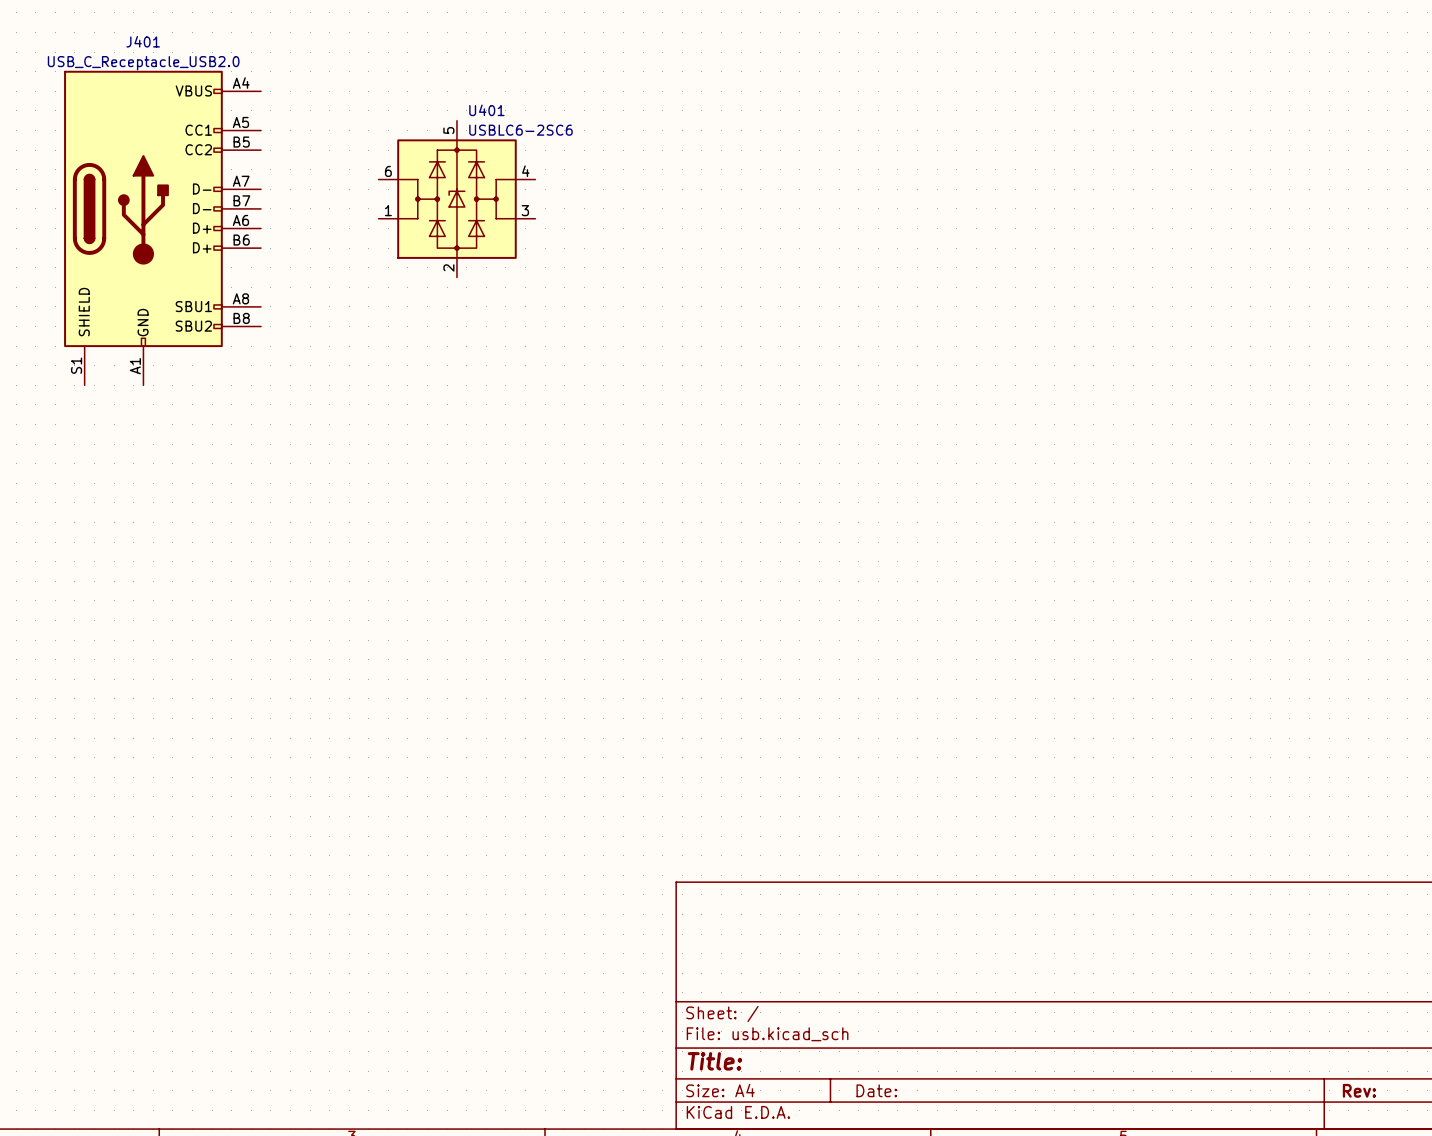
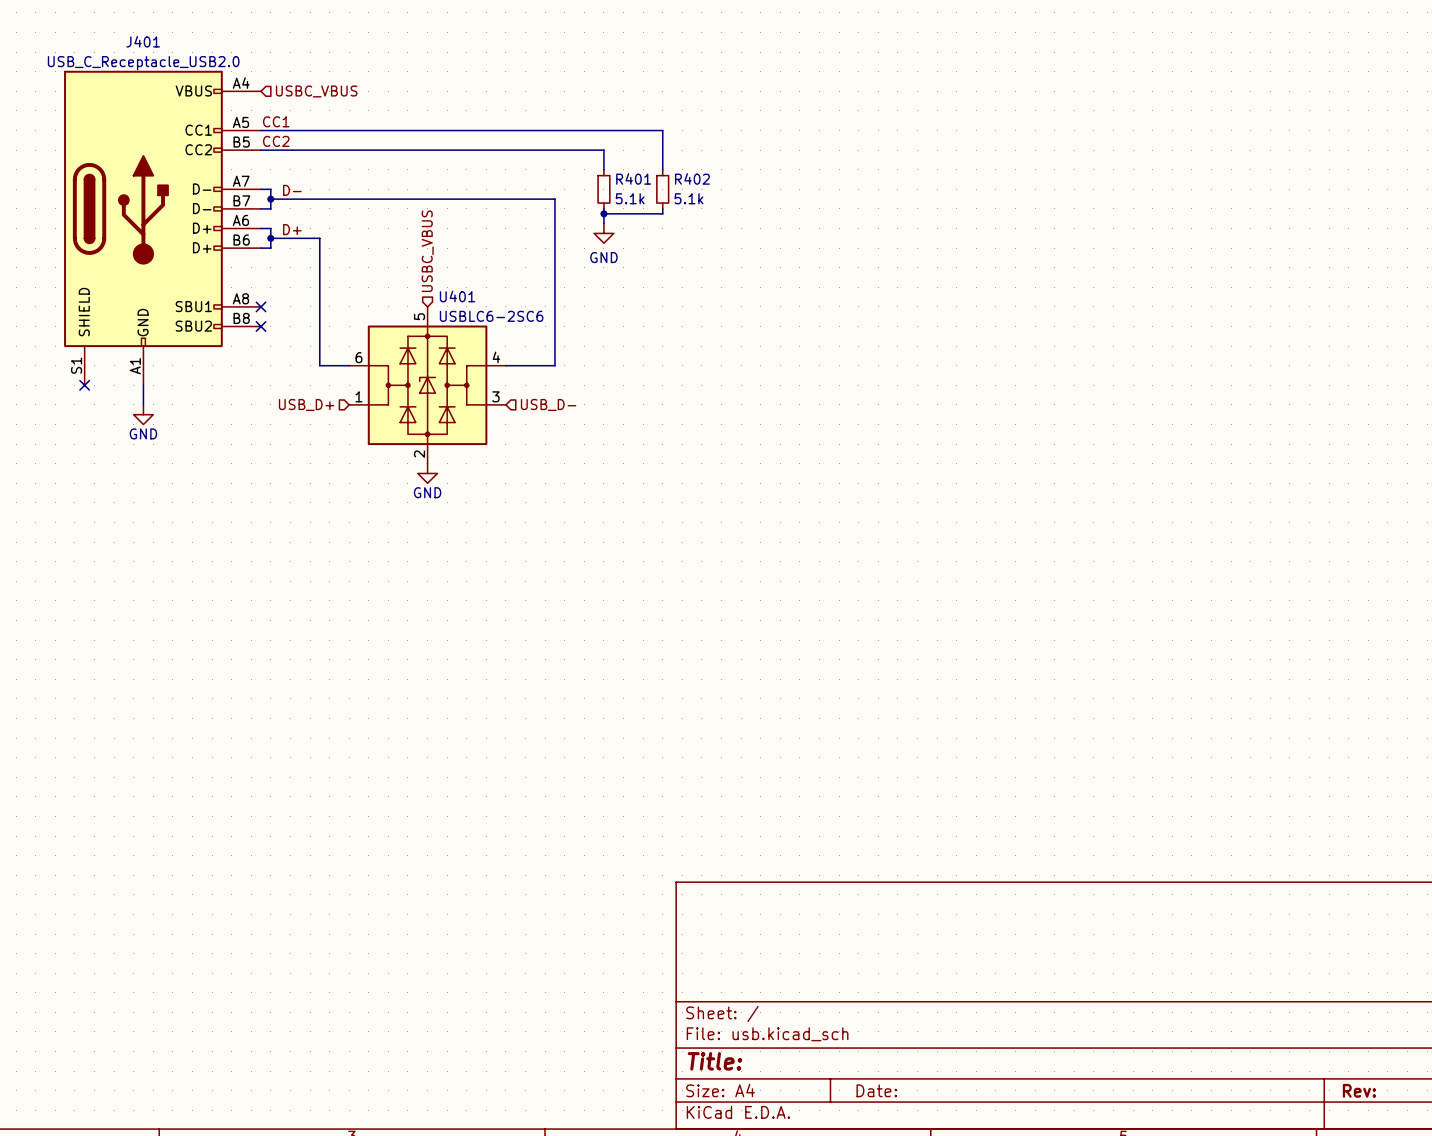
hierarchical label: none -> USBC_VBUS (316, 91)
label: none -> CC1 (276, 121)
wire: none -> (261, 130) (662, 130) (662, 169)
label: none -> CC2 (276, 141)
wire: none -> (261, 150) (603, 150) (603, 169)
wire: none -> (261, 189) (270, 189) (270, 208) (261, 208)
R401: none -> 5.1k (603, 189)
R402: none -> 5.1k (662, 189)
label: none -> D- (292, 190)
wire: none -> (270, 199) (554, 199) (554, 365) (505, 365)
junction: none -> (270, 199)
U401 position: (456, 199) -> (427, 385)
wire: none -> (603, 208) (603, 223)
wire: none -> (662, 208) (662, 213) (603, 213)
junction: none -> (603, 213)
wire: none -> (261, 228) (270, 228) (270, 248) (261, 248)
label: none -> D+ (292, 229)
power symbol: none -> GND (603, 233)
wire: none -> (270, 238) (319, 238) (319, 365) (349, 365)
junction: none -> (270, 238)
hierarchical label: none -> USBC_VBUS (427, 251)
no-connect mark: none -> (261, 306)
no-connect mark: none -> (261, 326)
no-connect mark: none -> (84, 385)
wire: none -> (143, 385) (143, 404)
hierarchical label: none -> USB_D+ (306, 405)
hierarchical label: none -> USB_D- (548, 405)
power symbol: none -> GND (143, 414)
power symbol: none -> GND (427, 473)

